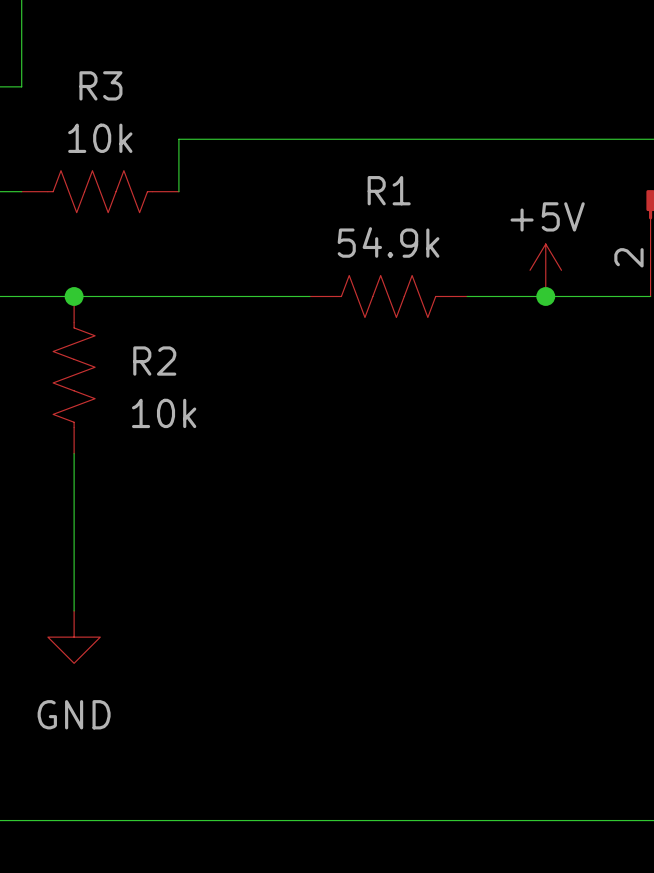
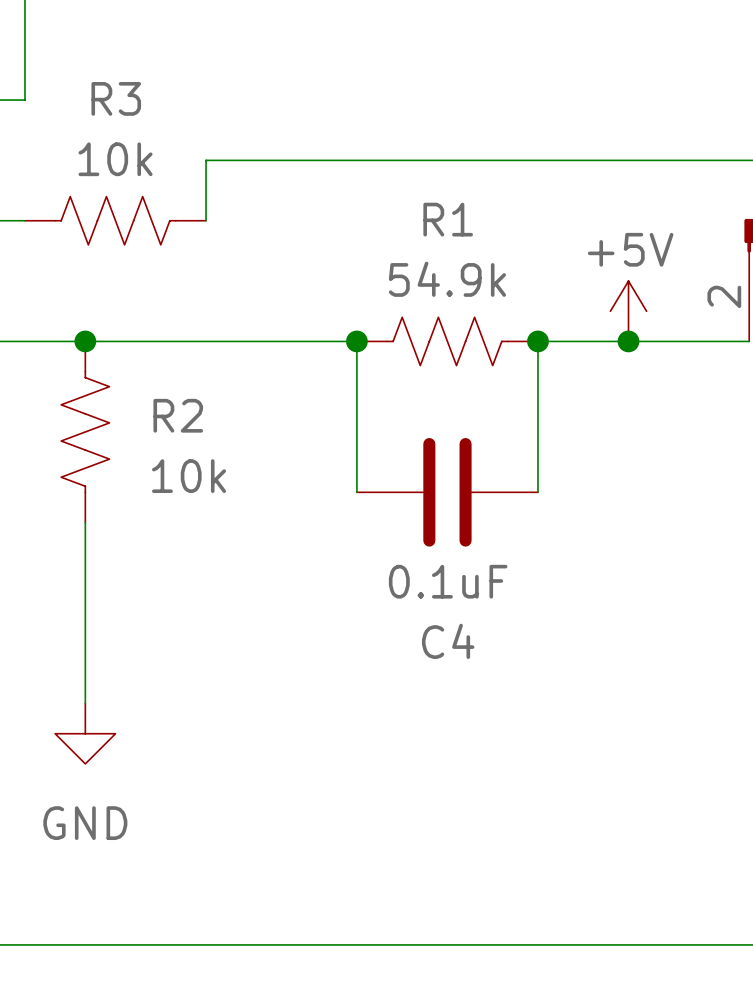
wire: none -> (356, 341) (356, 492)
junction: none -> (356, 341)
wire: none -> (537, 341) (537, 492)
junction: none -> (537, 341)
C4: none -> 0.1uF (447, 492)

